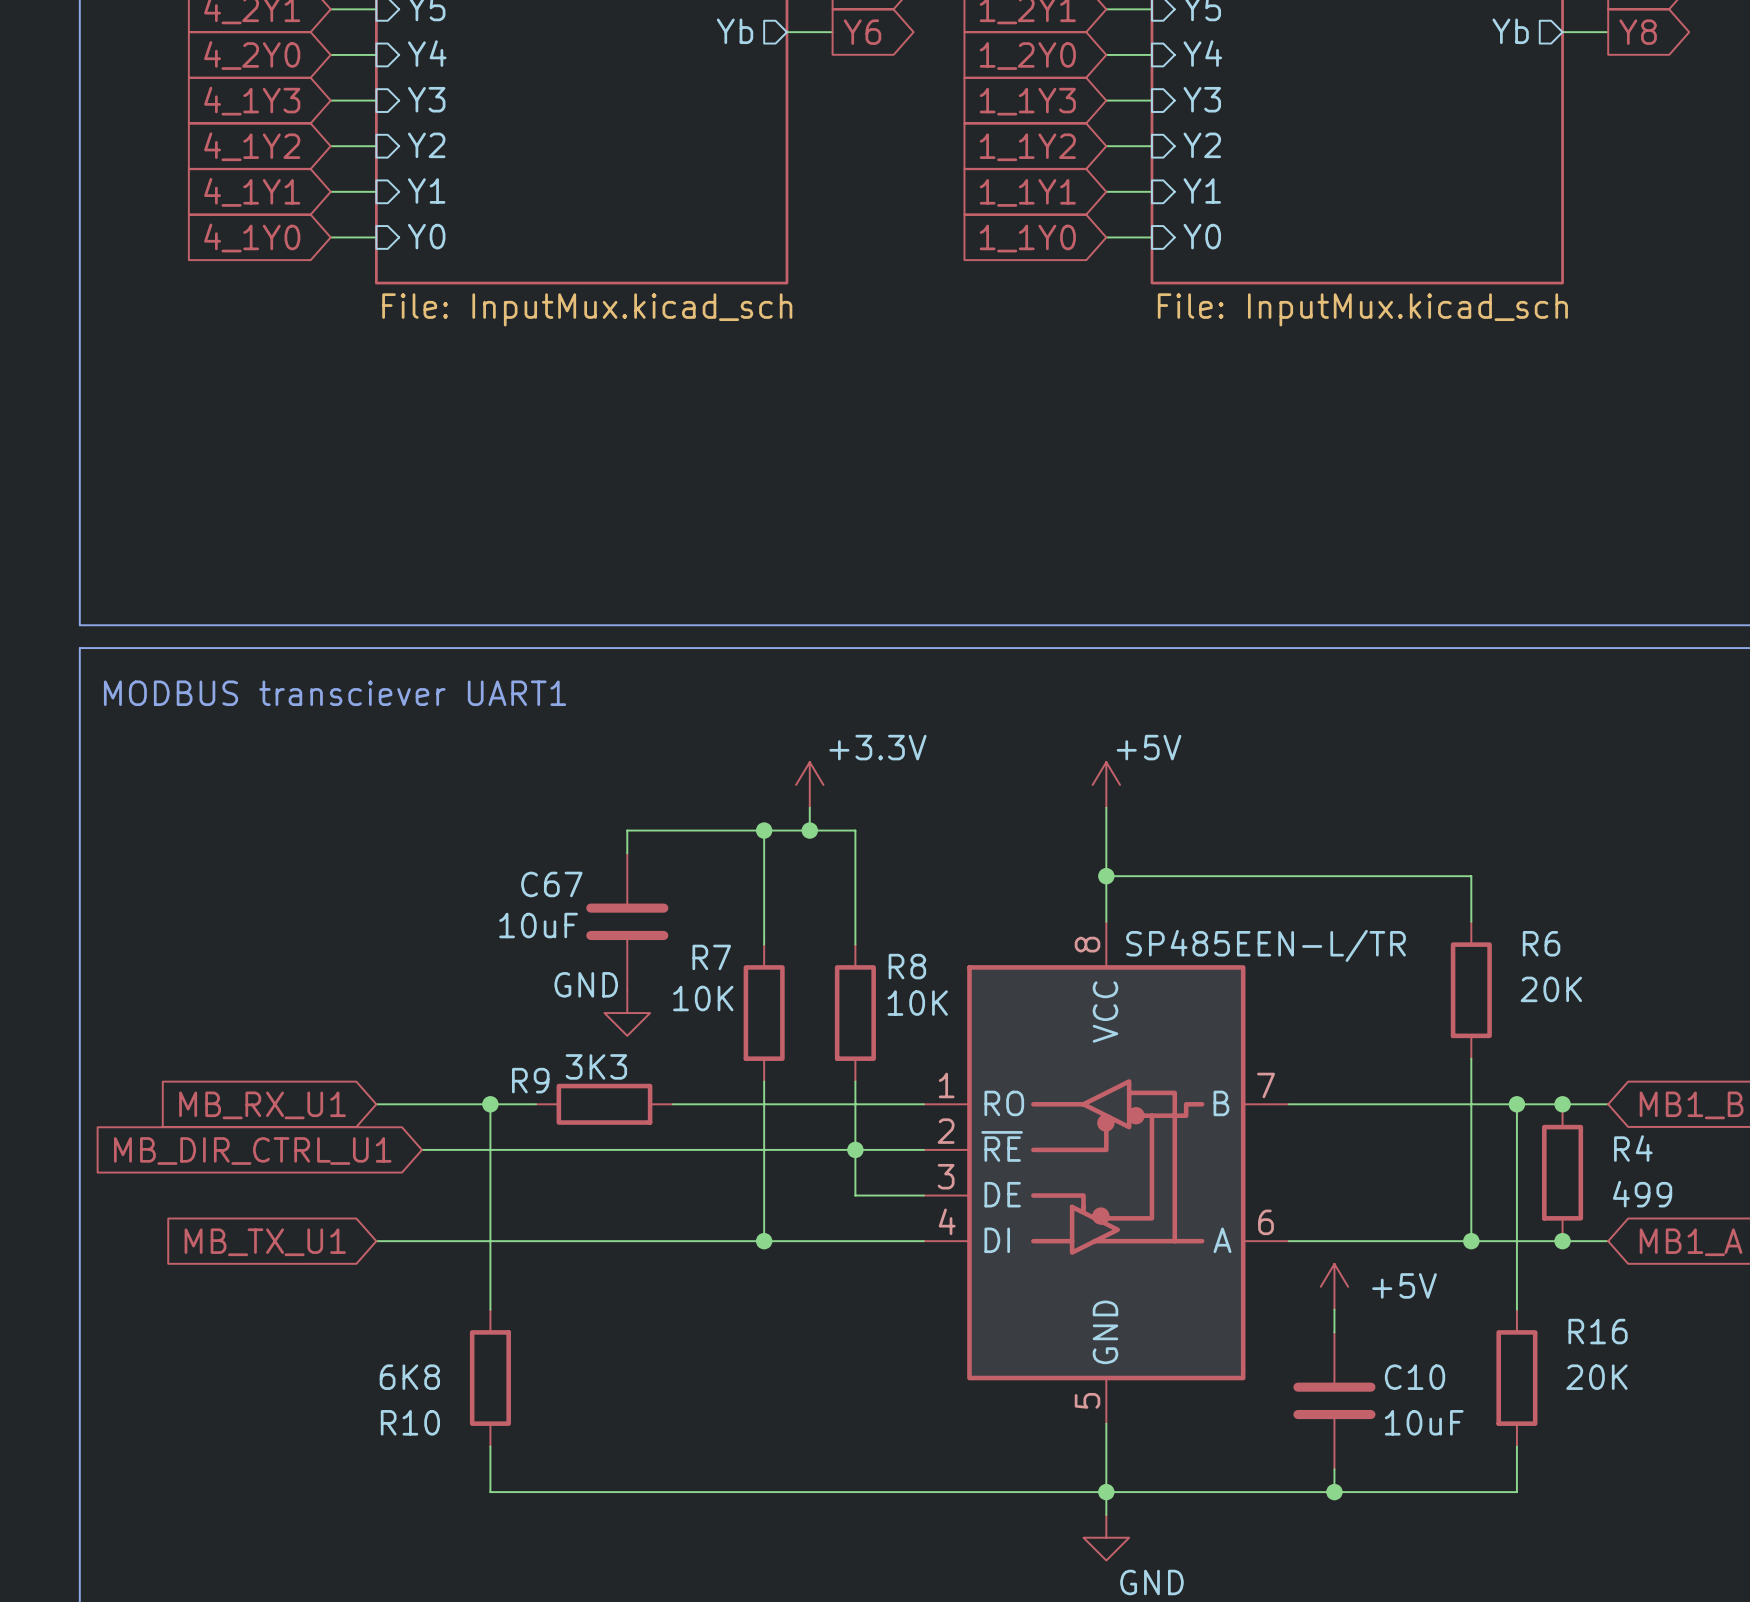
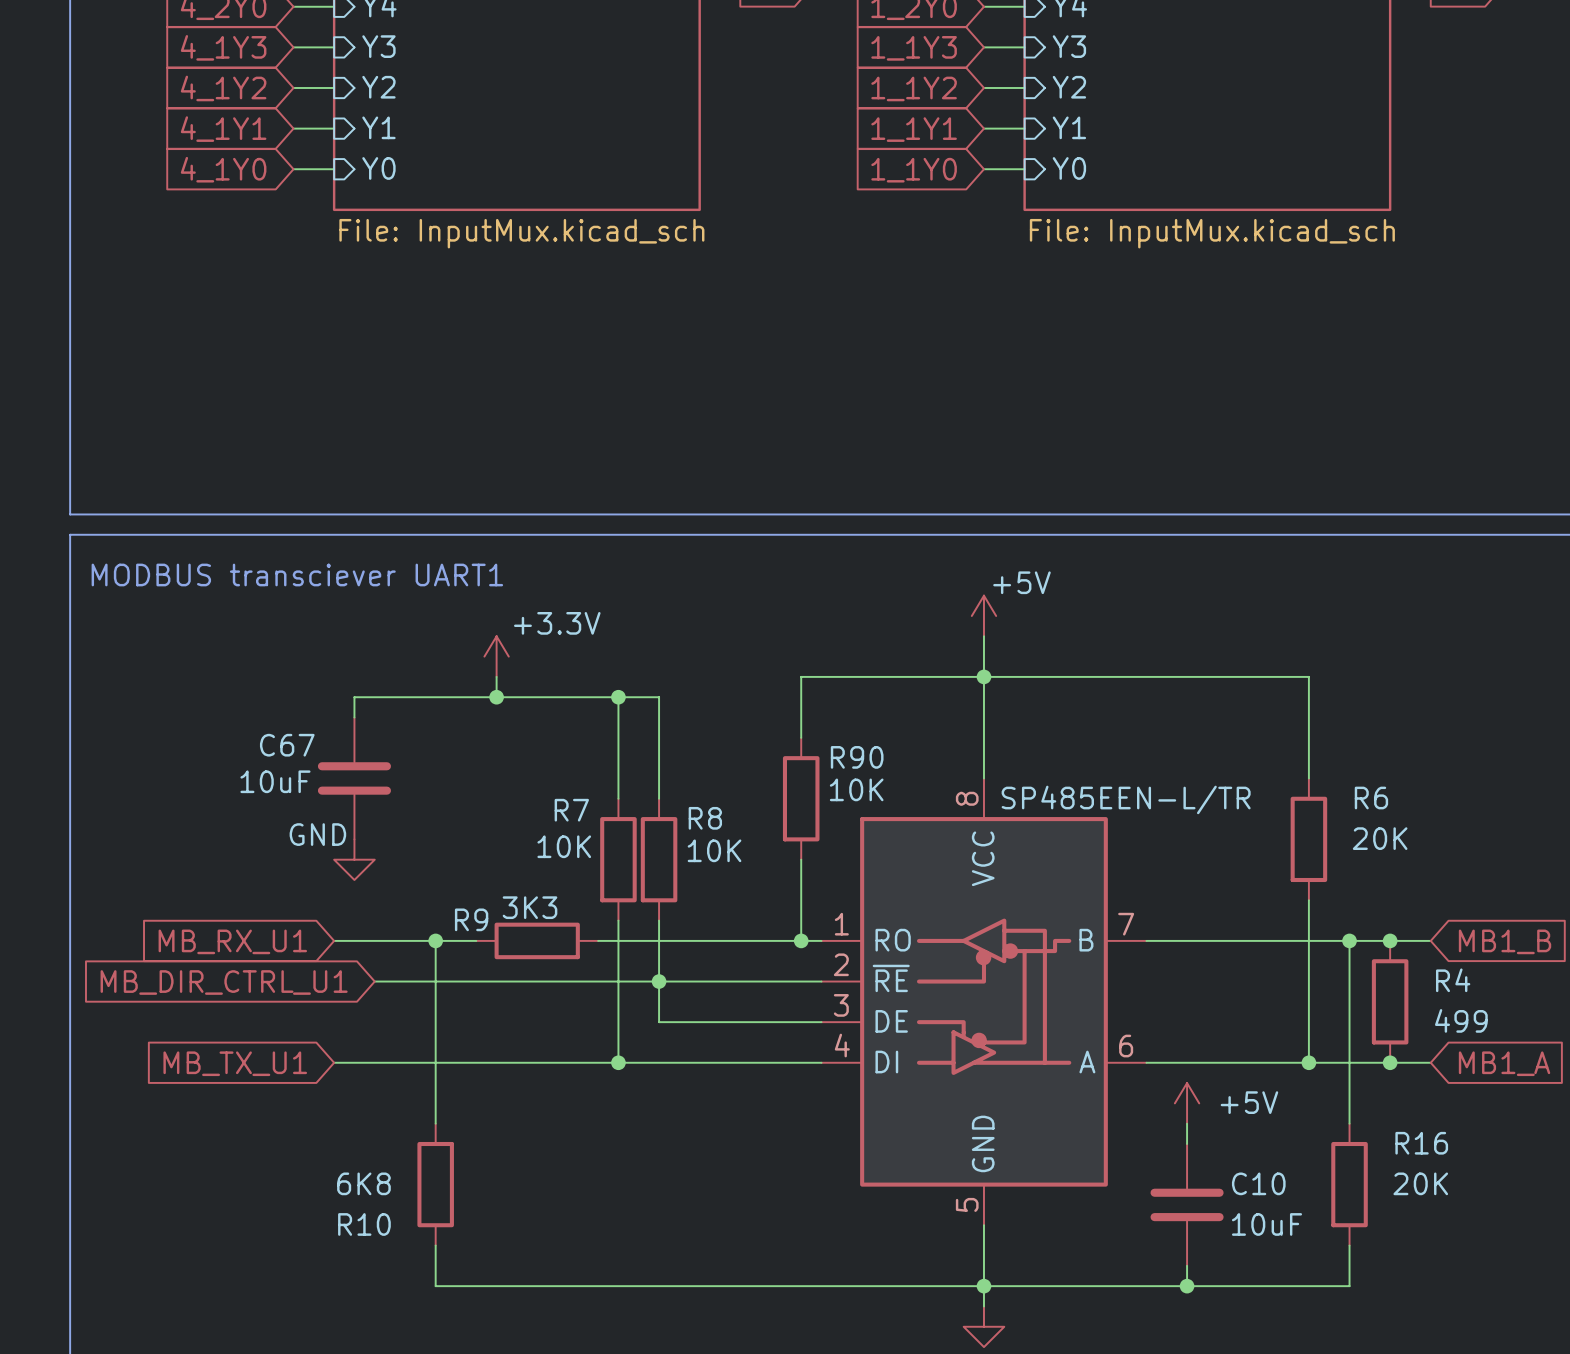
power symbol position: +3.3V (809, 784) -> +3.3V (496, 656)
power symbol position: +5V (1106, 784) -> +5V (983, 616)
wire: (809, 807) (809, 830) -> (496, 676) (496, 697)
junction: none -> (496, 697)
wire: (627, 830) (627, 853) -> (557, 697) (354, 697) (354, 717)
junction: none -> (618, 697)
wire: (741, 830) (855, 830) (855, 944) -> (659, 697) (659, 798)
wire: (764, 830) (764, 944) -> (618, 697) (618, 798)
junction: (764, 830) -> none
junction: (809, 830) -> none
wire: (1106, 876) (1471, 876) -> (801, 737) (801, 676) (1308, 676) (1308, 737)
junction position: (1106, 876) -> (983, 676)
C67 position: (627, 921) -> (354, 778)
R90: none -> 10K (801, 798)
power symbol position: GND (627, 1013) -> GND (354, 859)
R7 position: (764, 1013) -> (618, 859)
R8 position: (855, 1013) -> (659, 859)
wire: none -> (801, 859) (801, 940)
wire: (764, 1081) (764, 1241) -> (618, 920) (618, 1062)
wire: (855, 1081) (855, 1195) -> (659, 920) (659, 1022) (760, 1022)
junction: none -> (801, 940)
junction: none -> (659, 981)
junction: (855, 1149) -> none
junction: none -> (618, 1062)
junction: (764, 1241) -> none

